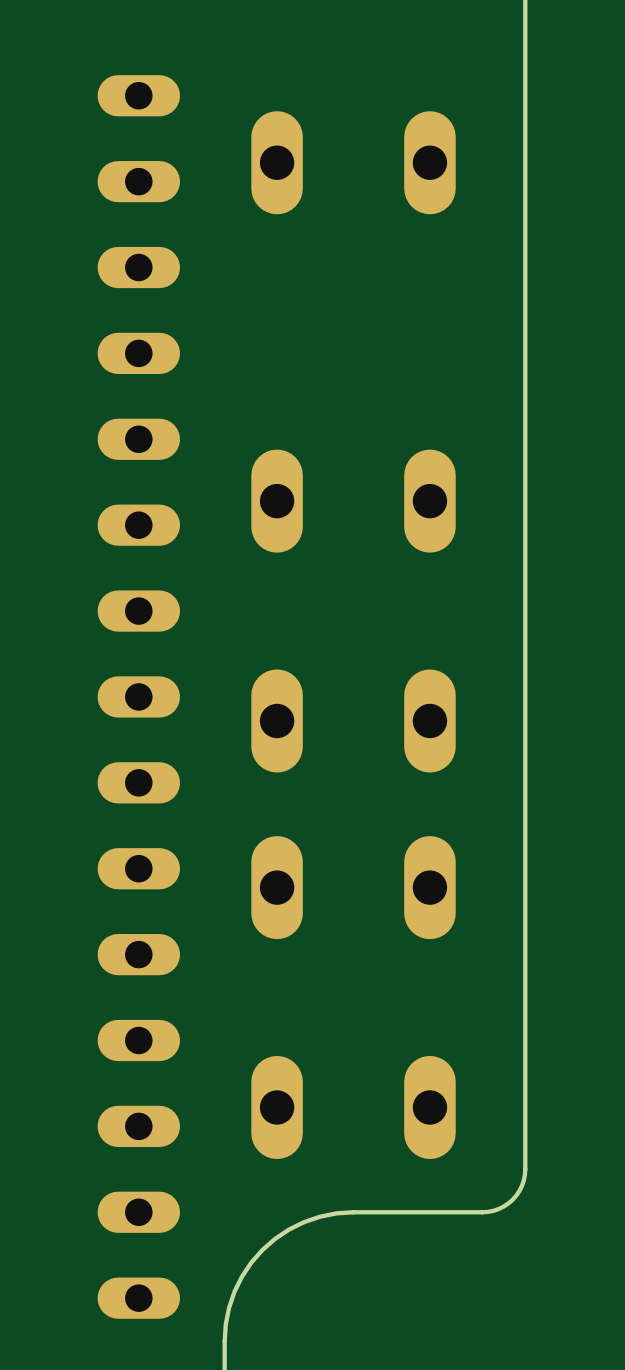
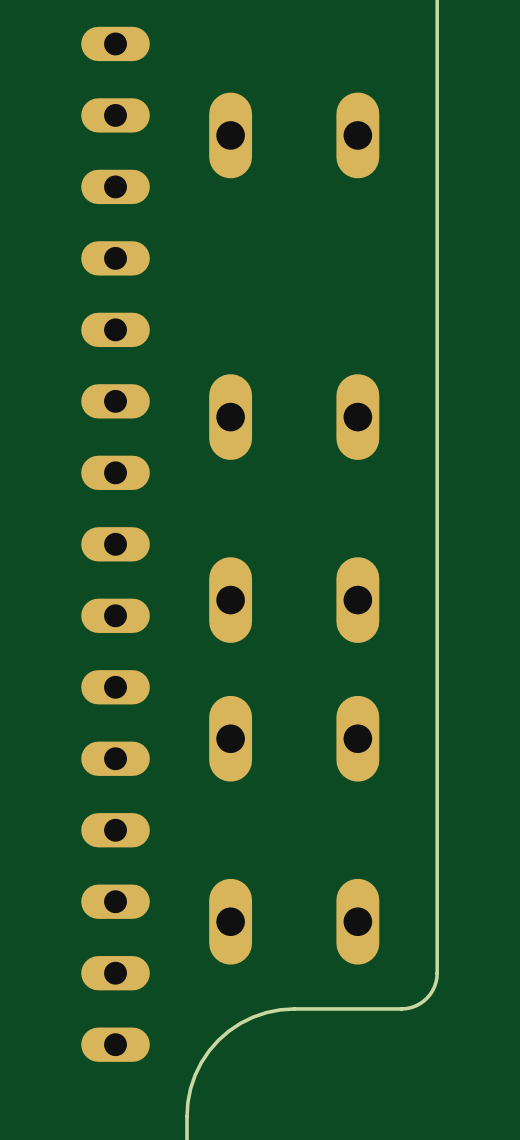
part position: (138, 696) -> (115, 544)

